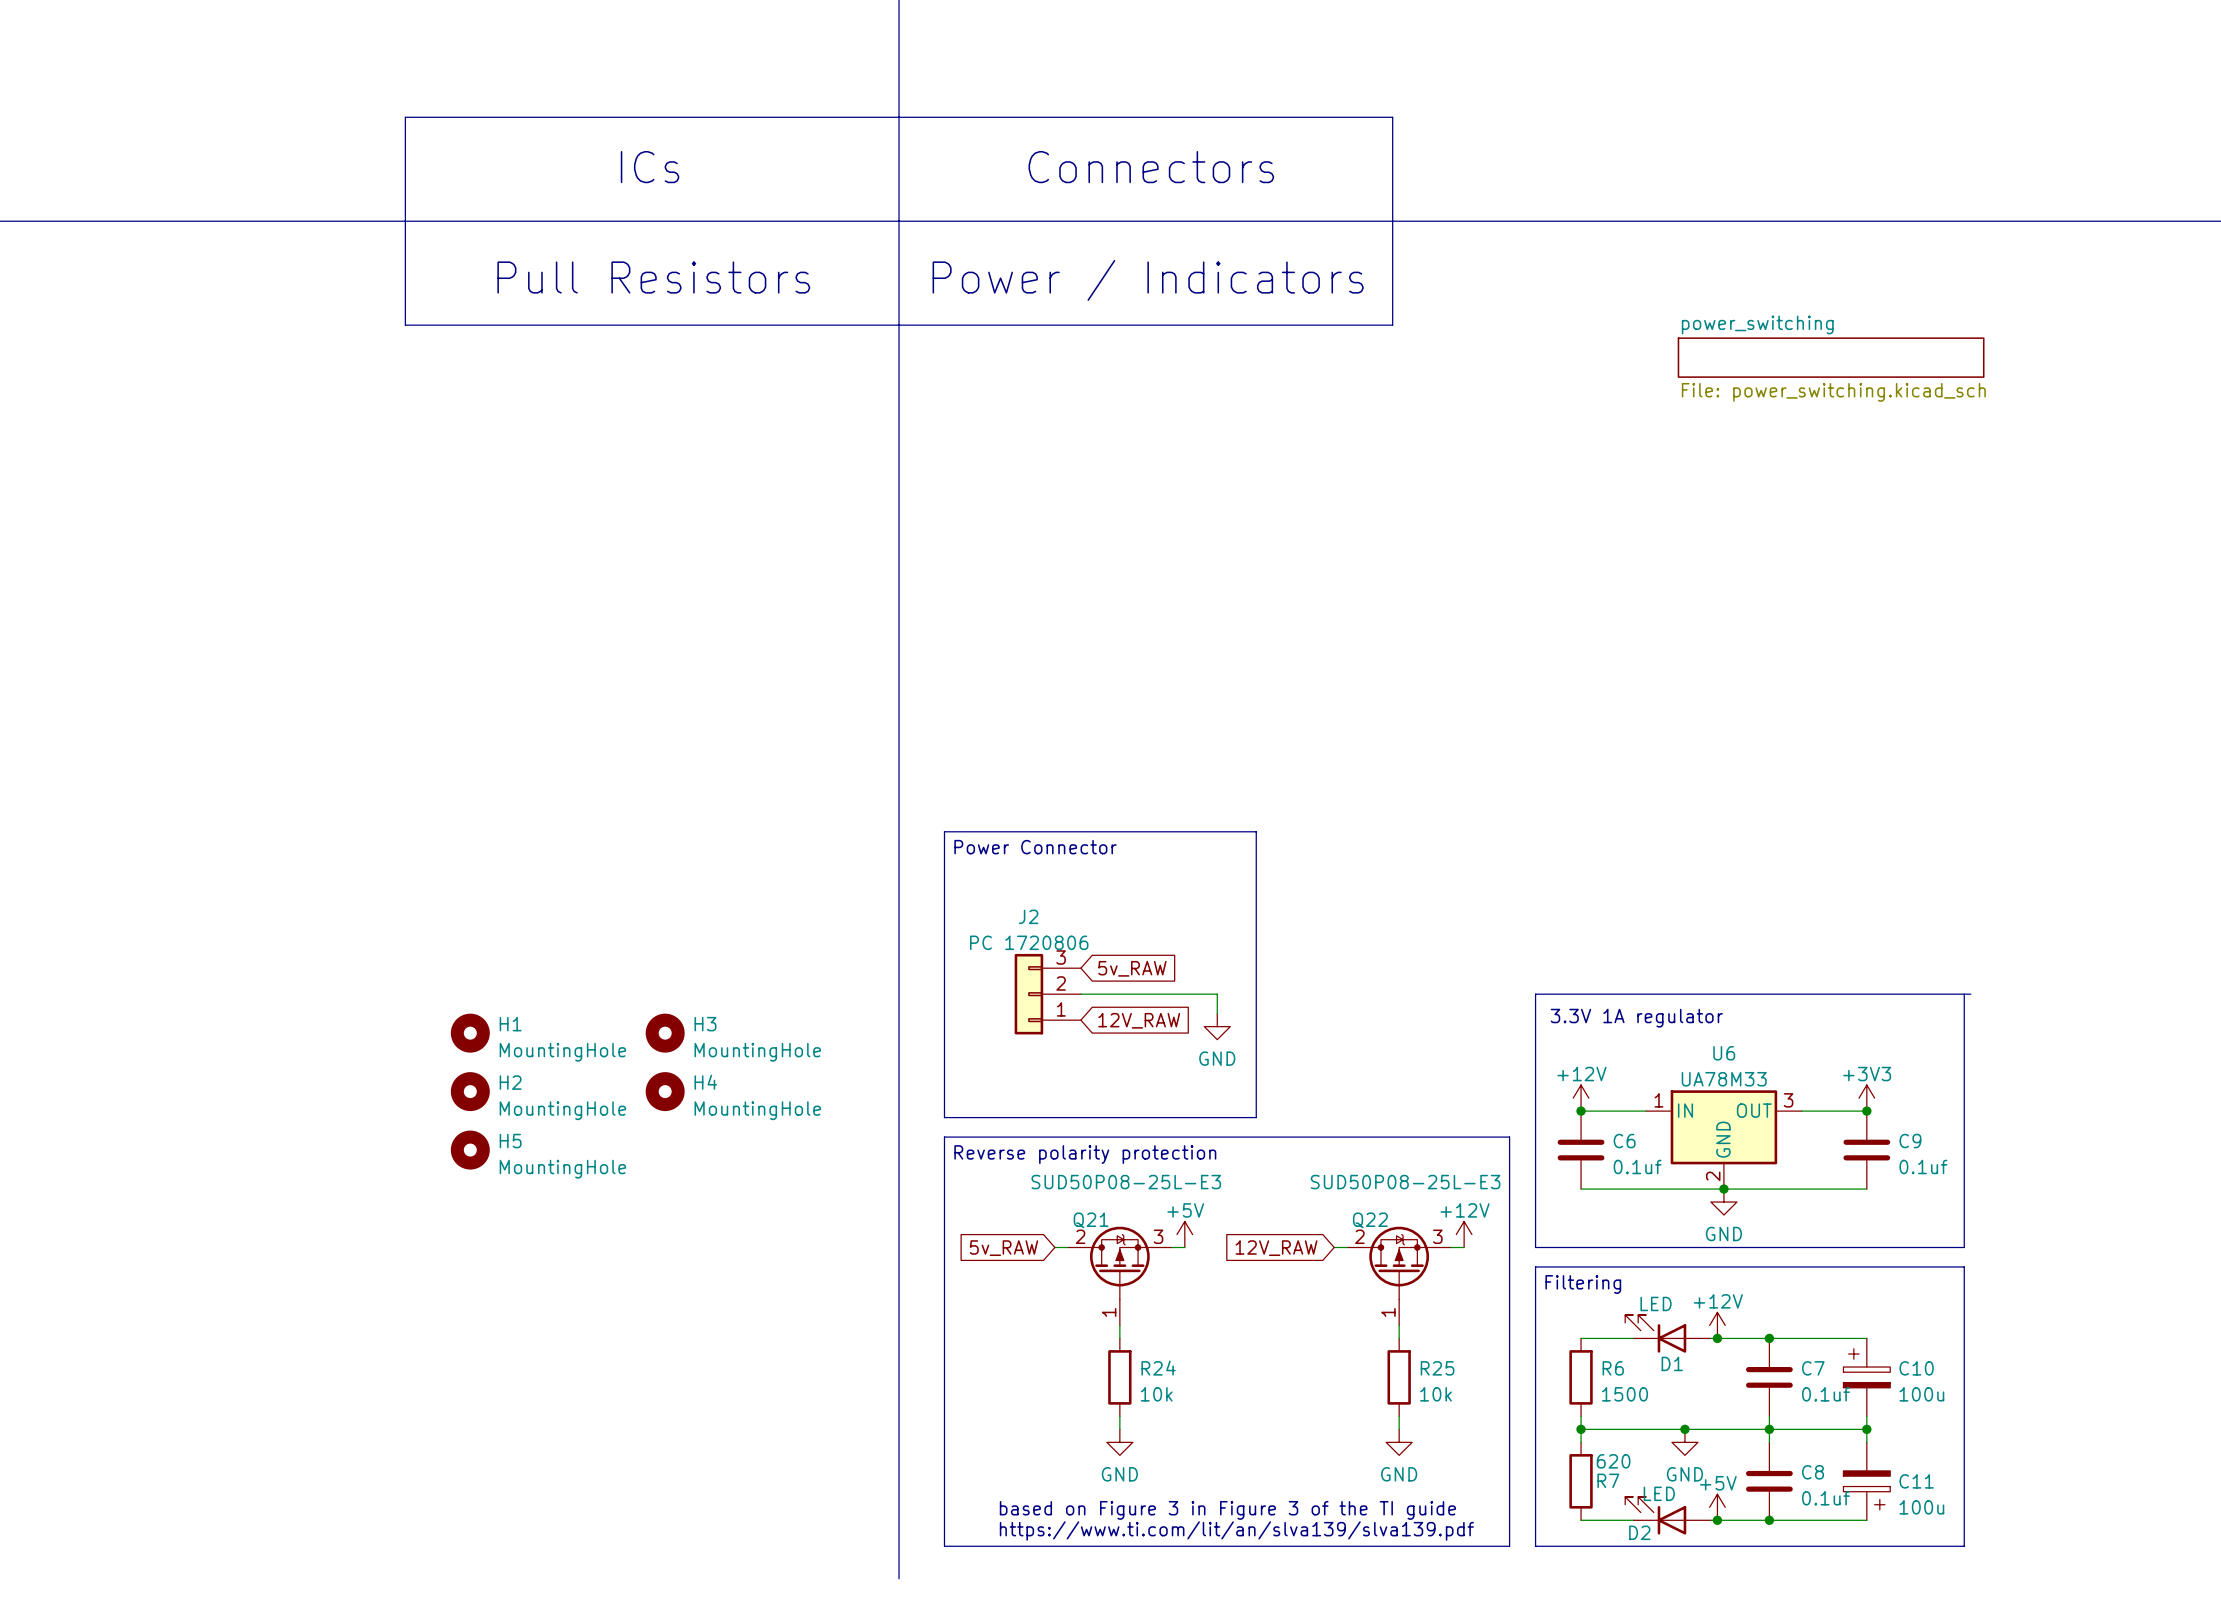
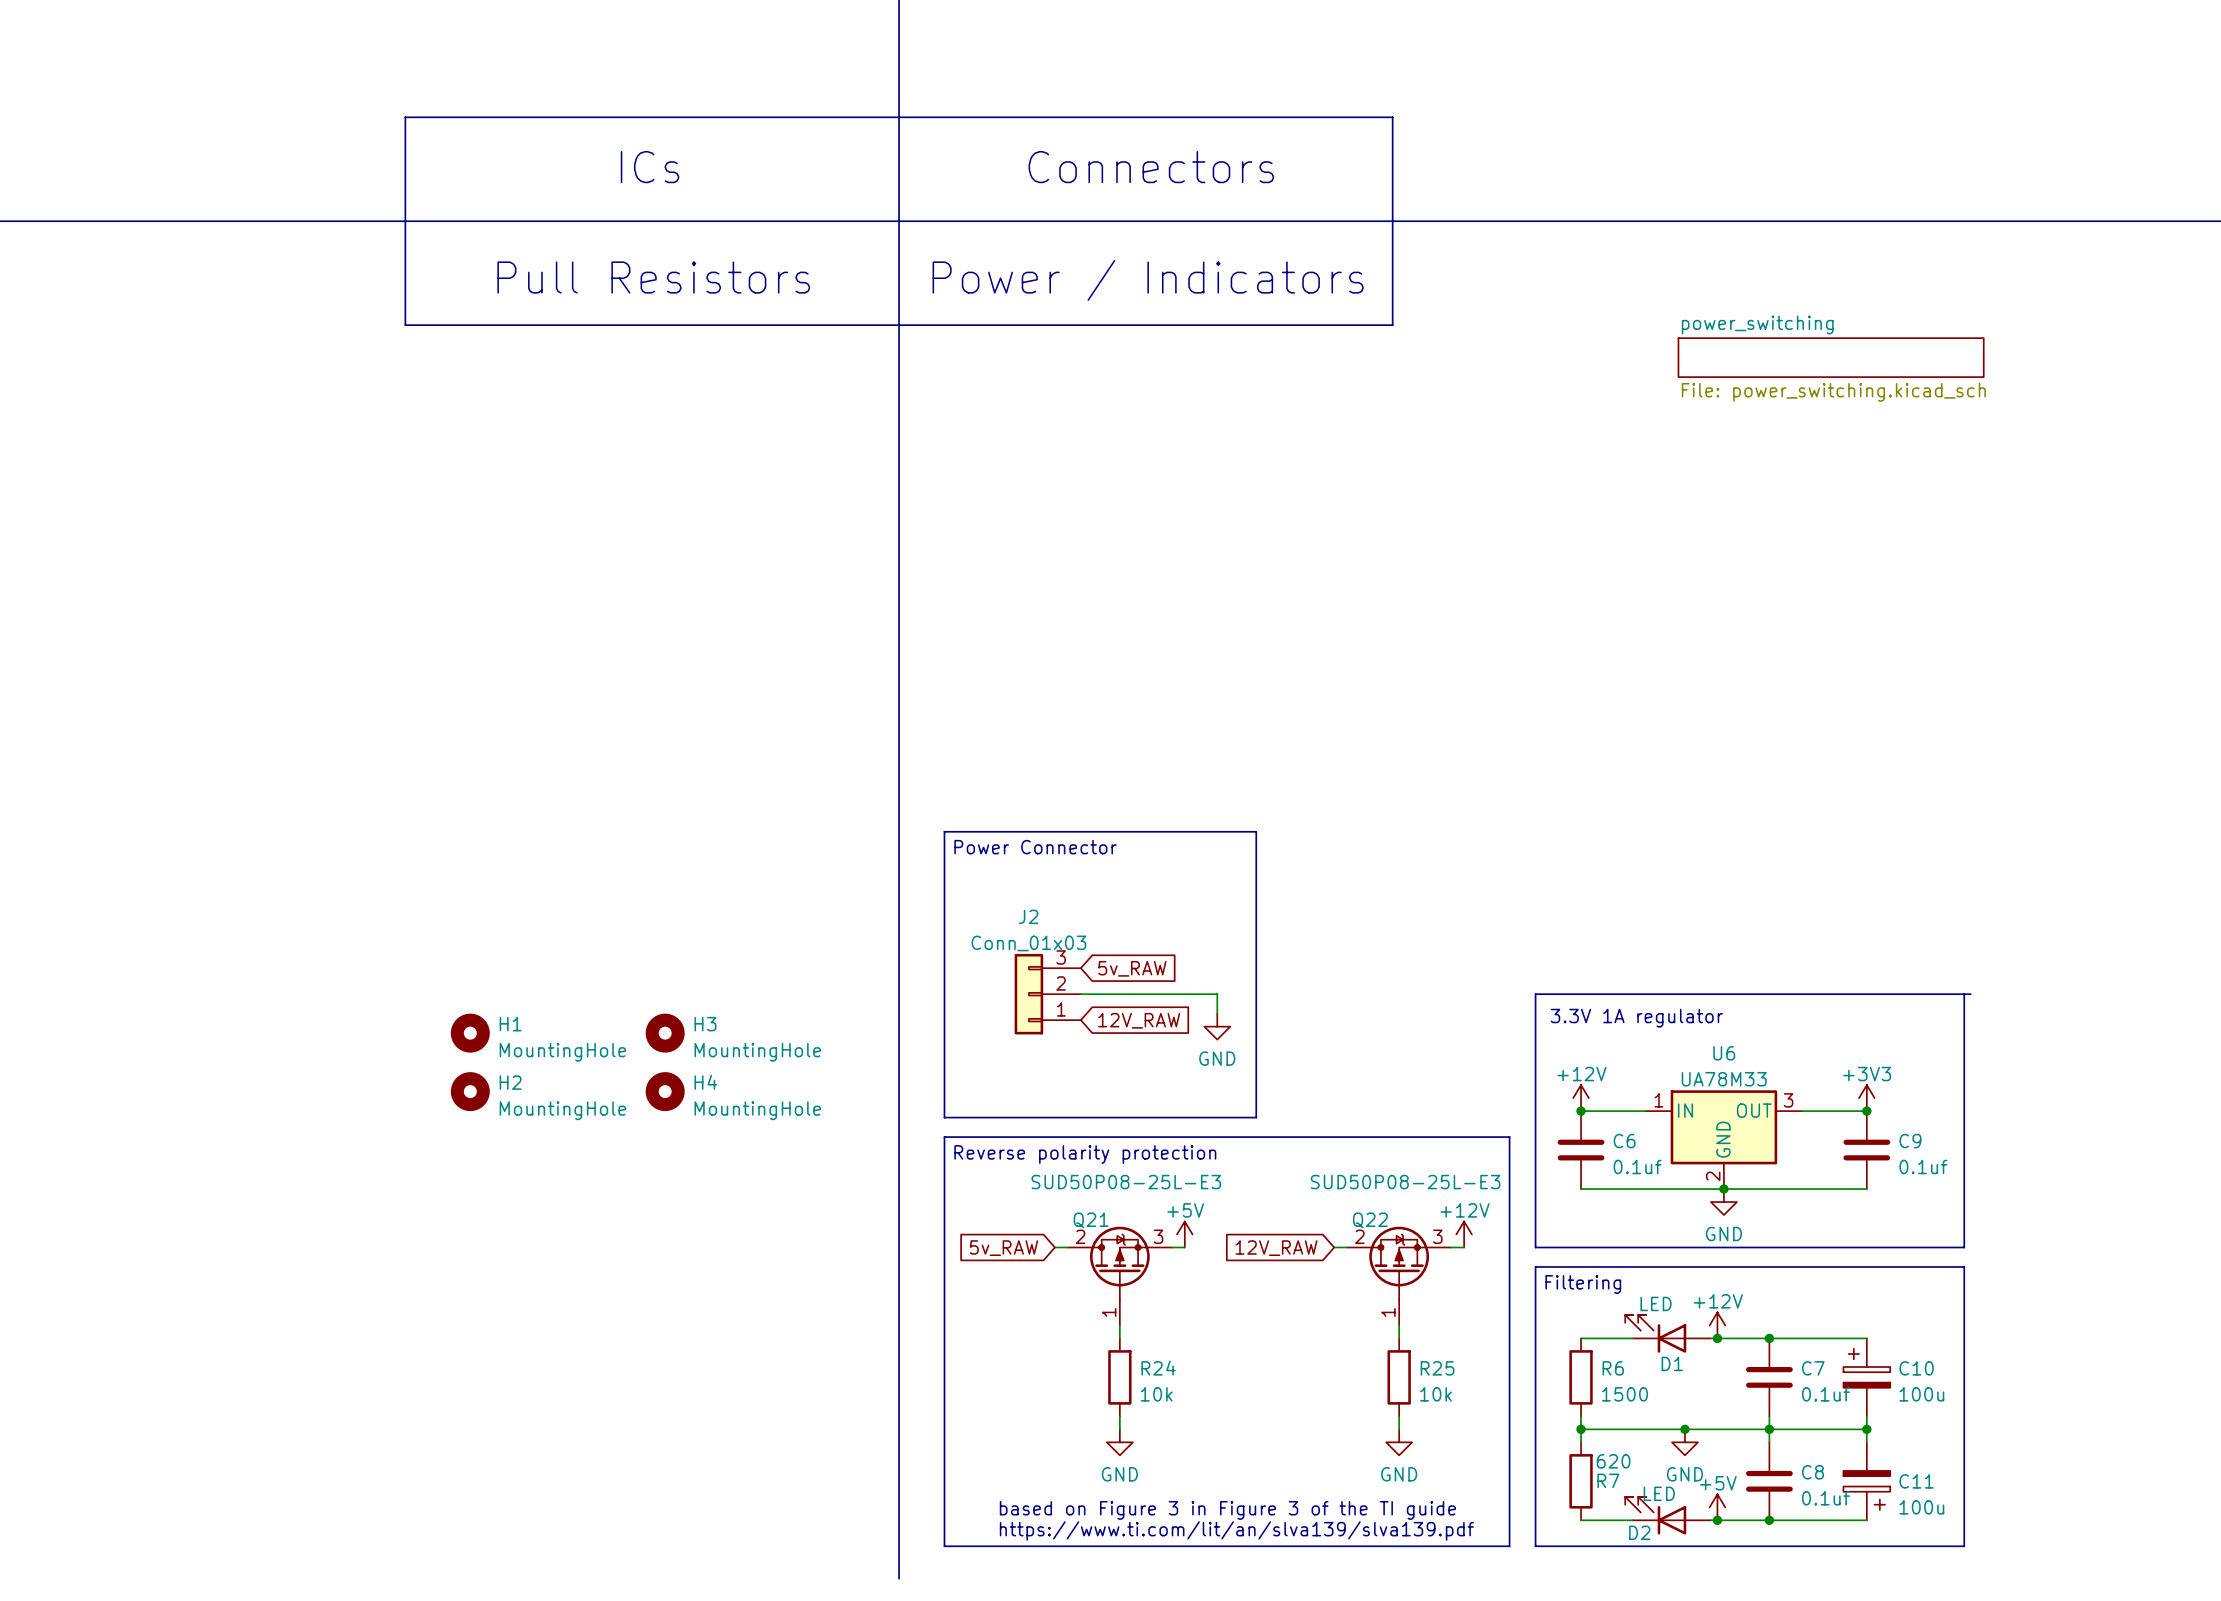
J2 value: PC 1720806 (1029, 942) -> Conn_01x03 (1028, 943)
H5: MountingHole (470, 1150) -> none

